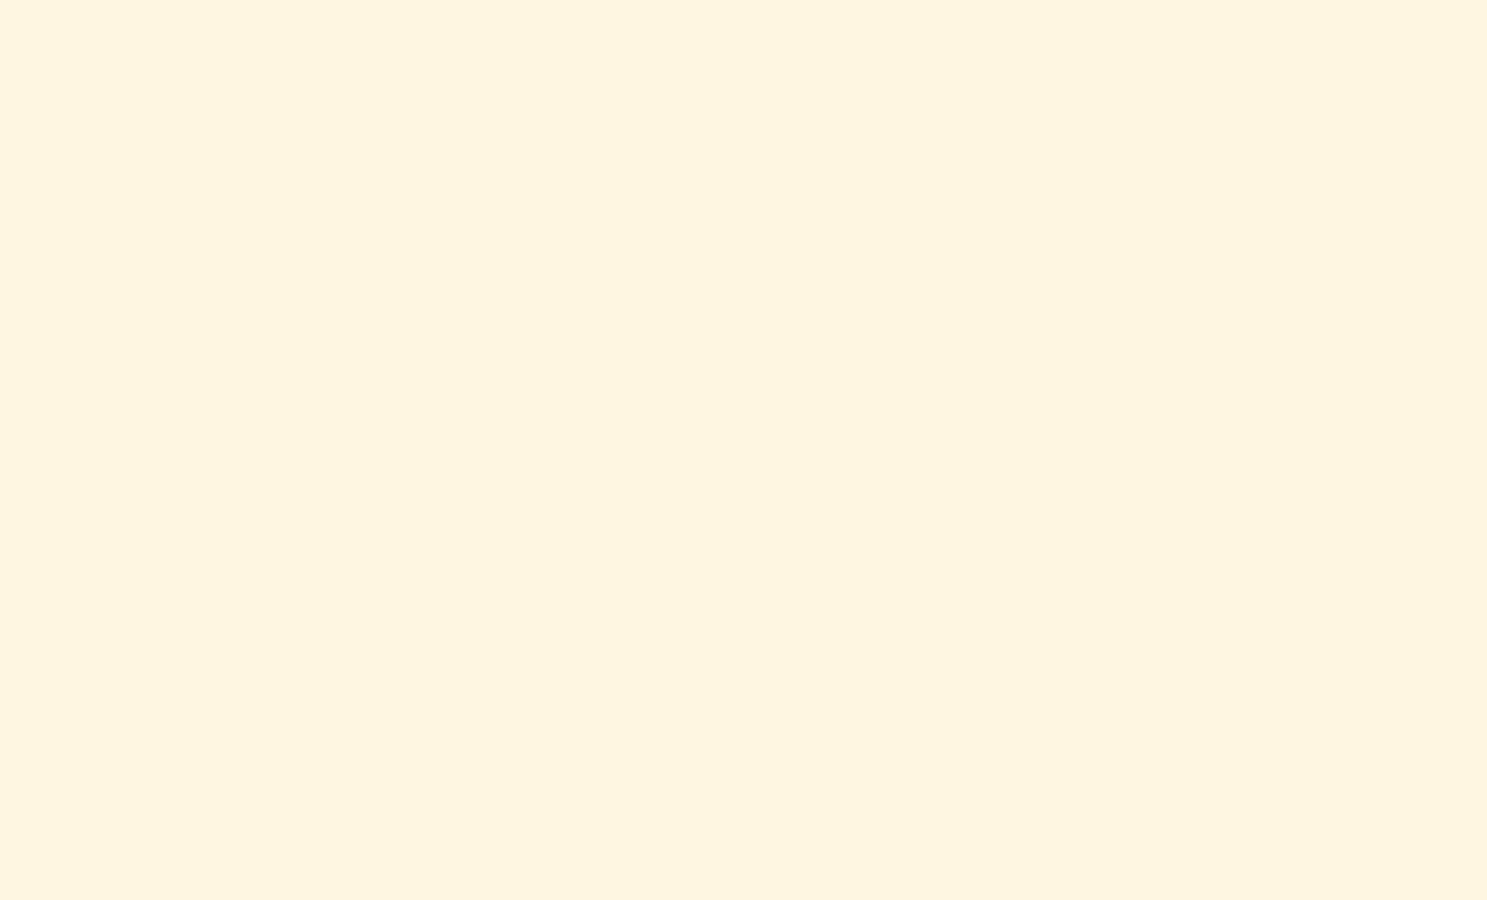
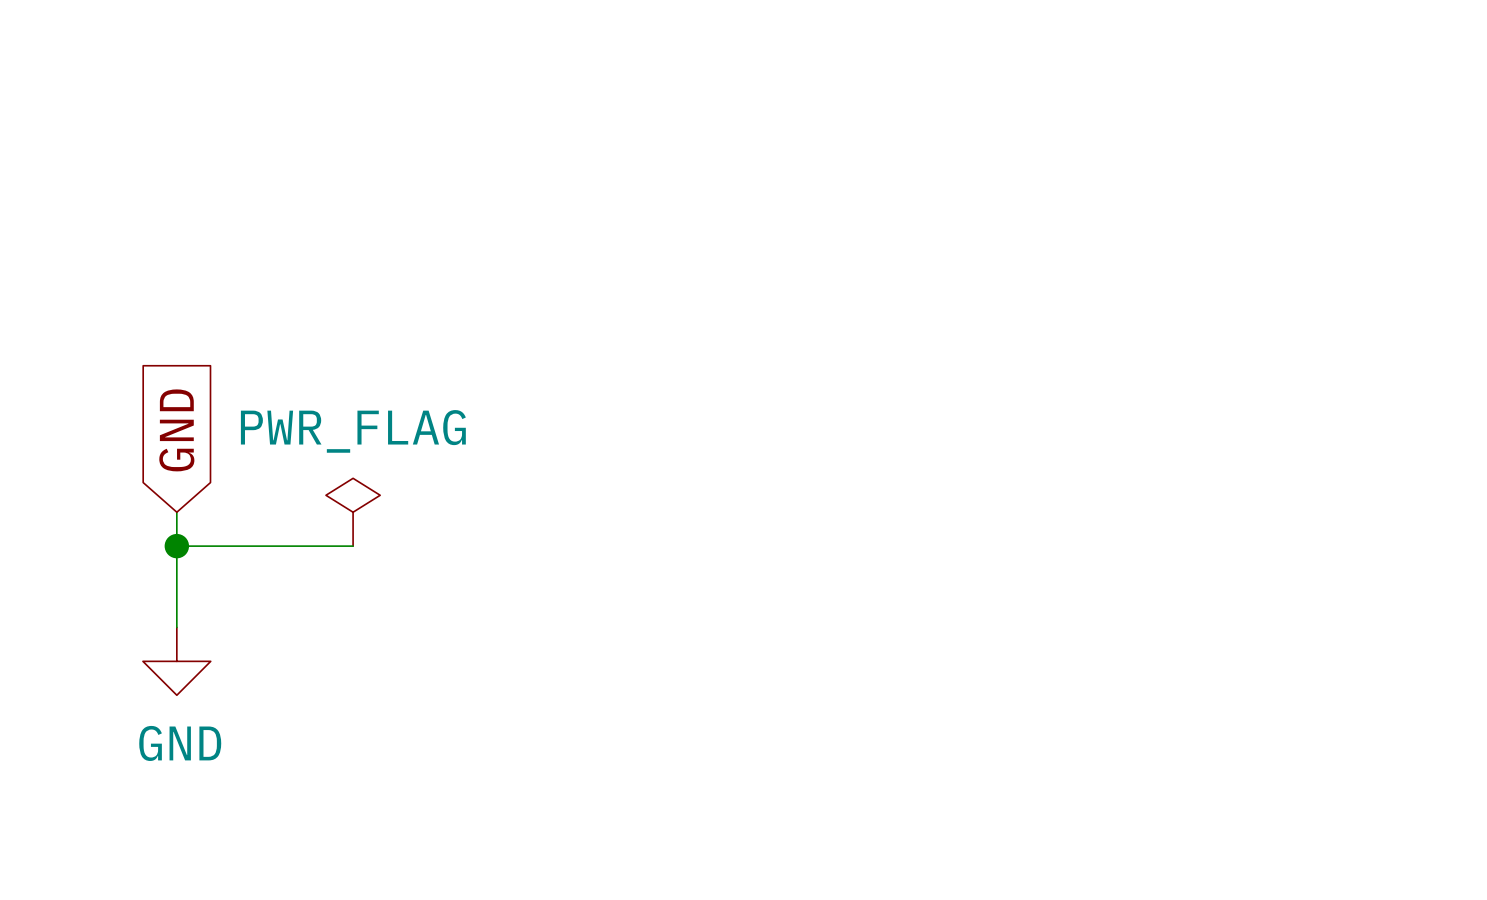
global label: none -> GND (176, 430)
wire: none -> (176, 512) (176, 627)
power symbol: none -> PWR_FLAG (353, 512)
wire: none -> (176, 546) (353, 546)
junction: none -> (176, 546)
power symbol: none -> GND (176, 661)

